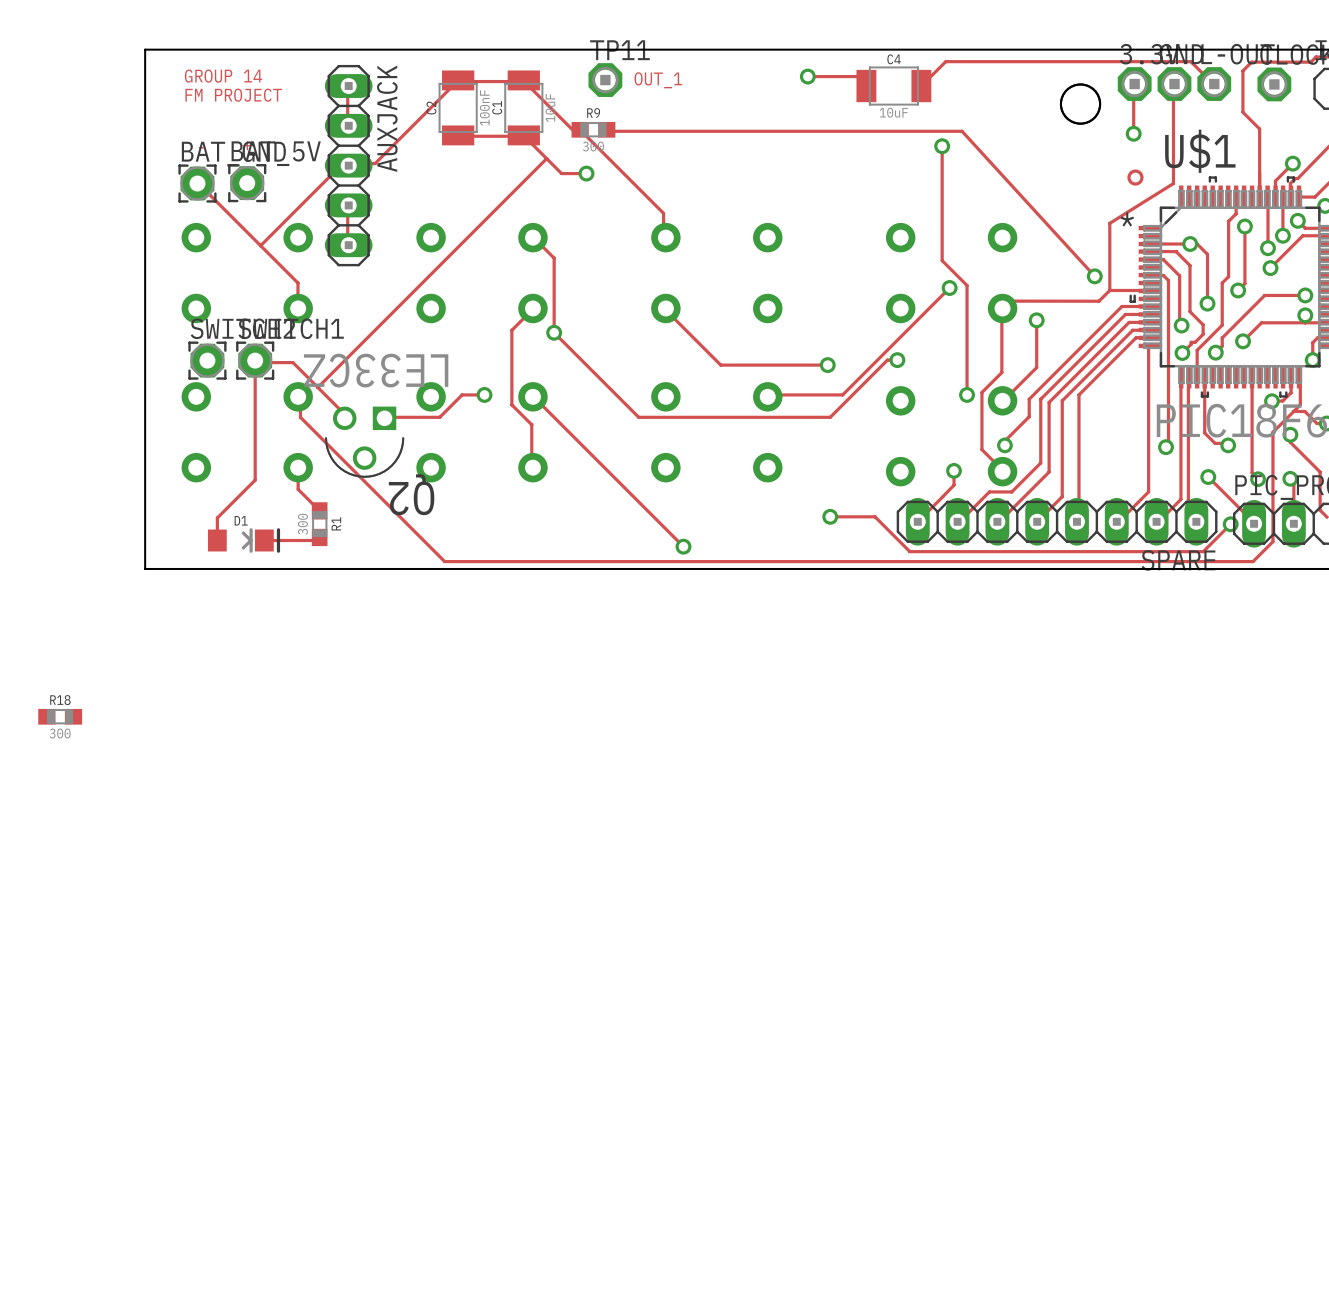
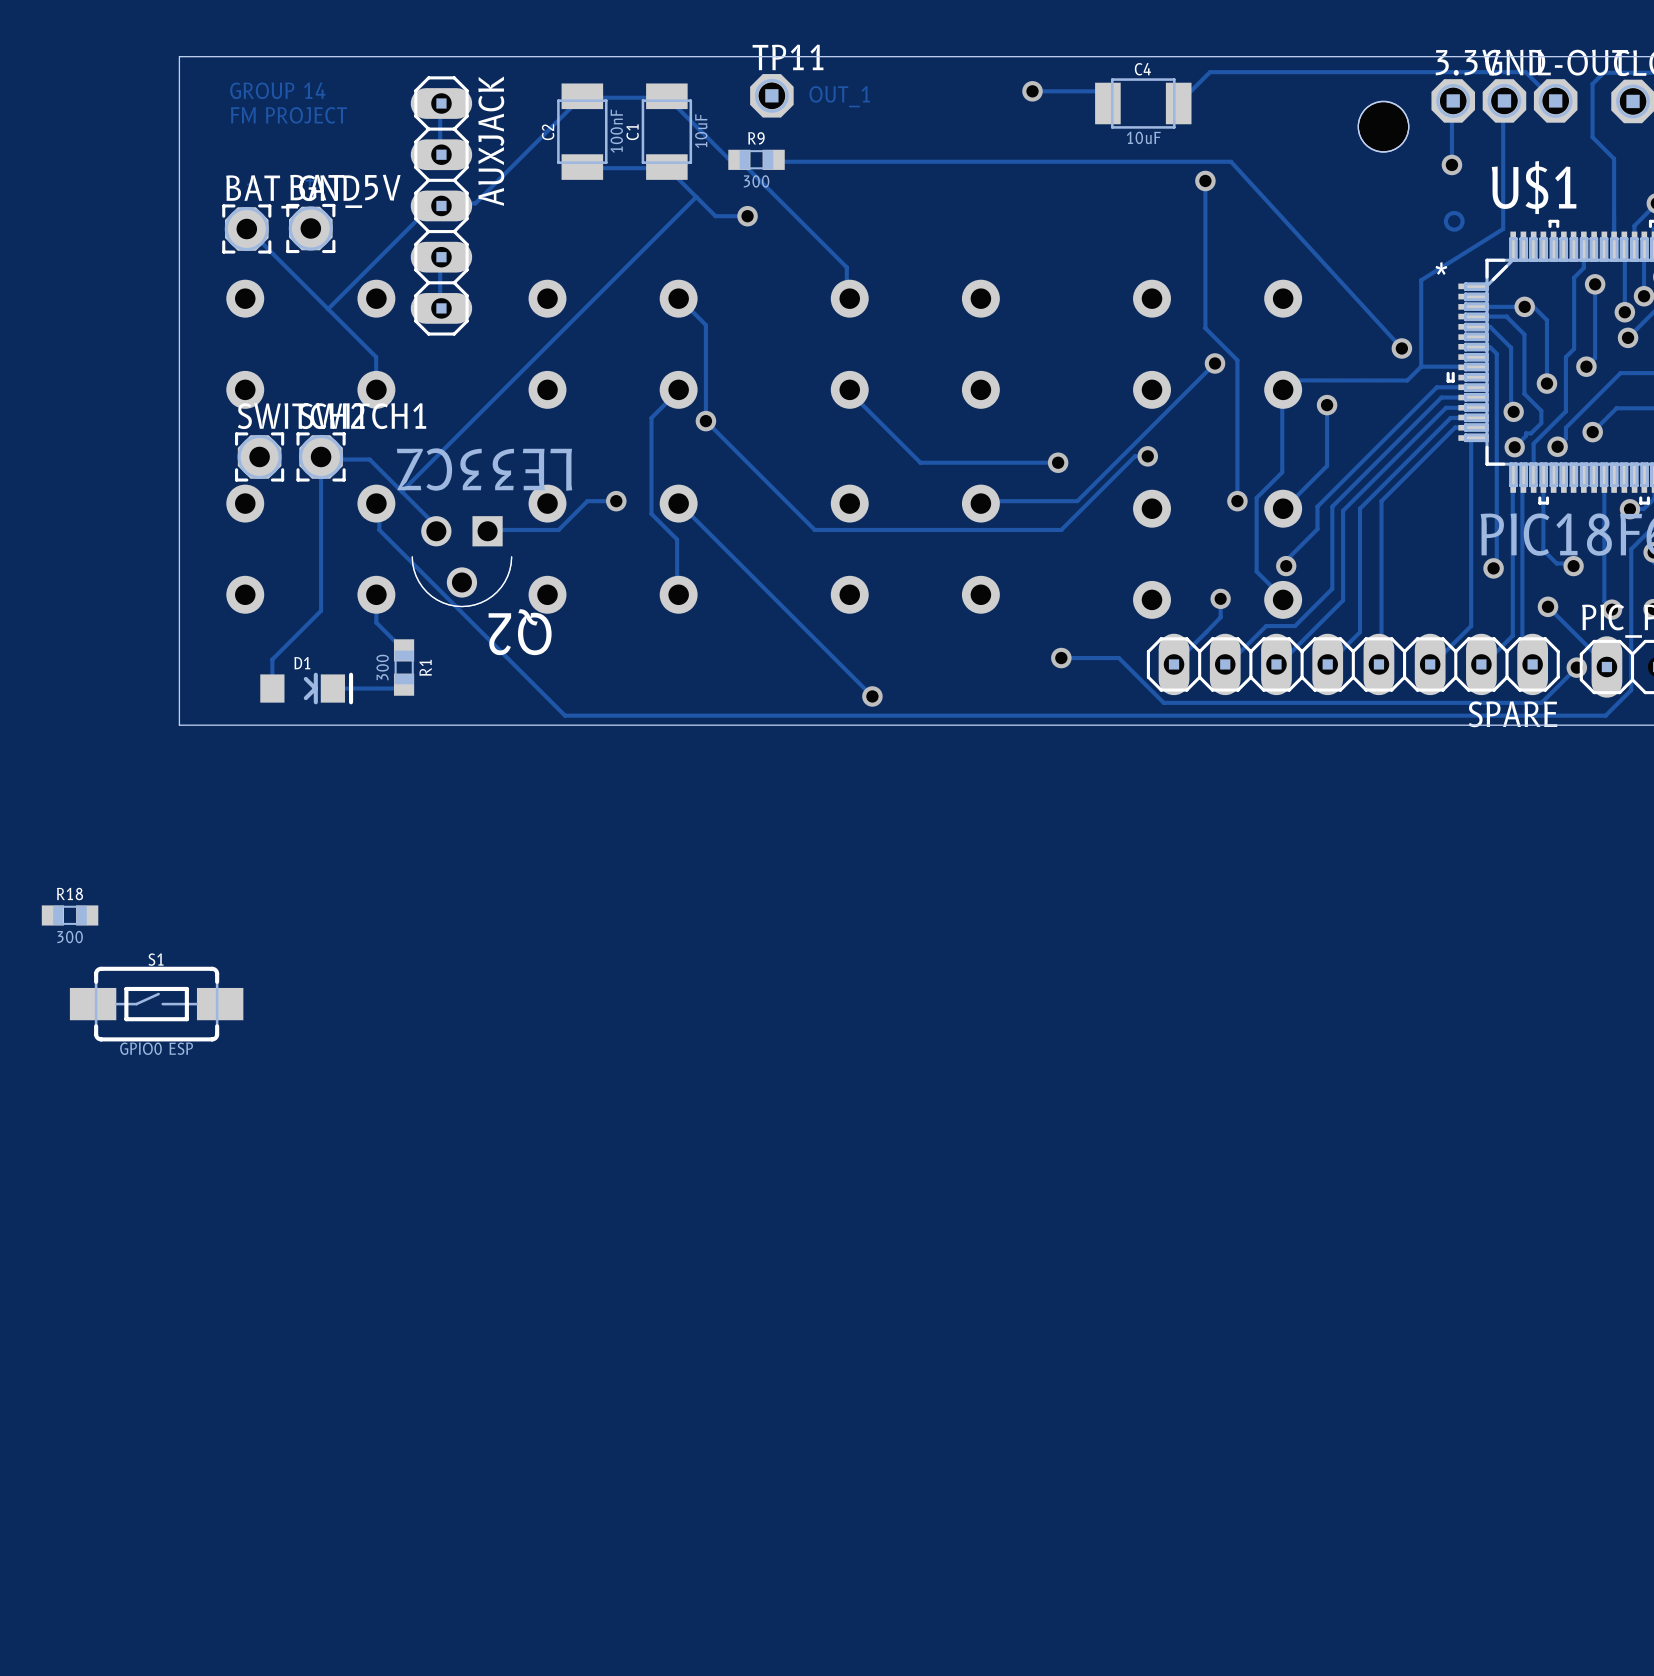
S1: none -> GPIO0 ESP (156, 1004)

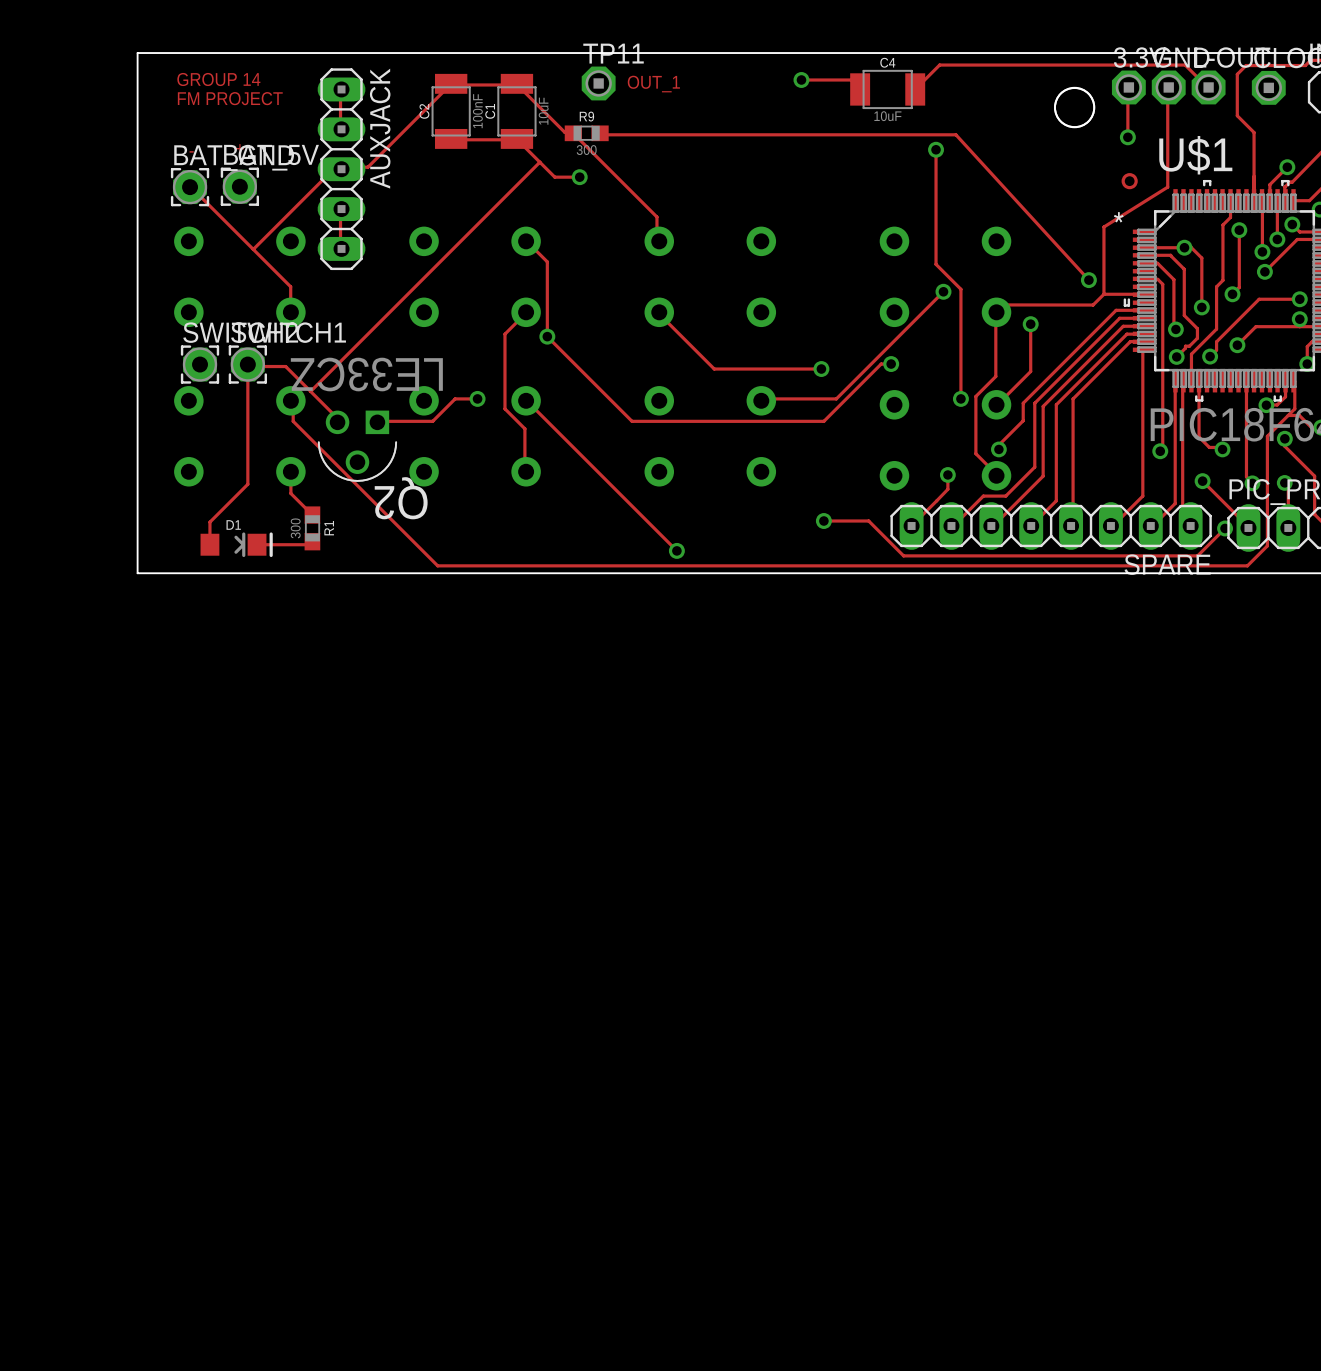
R18: 300 (70, 915) -> none
S1: GPIO0 ESP (156, 1004) -> none

